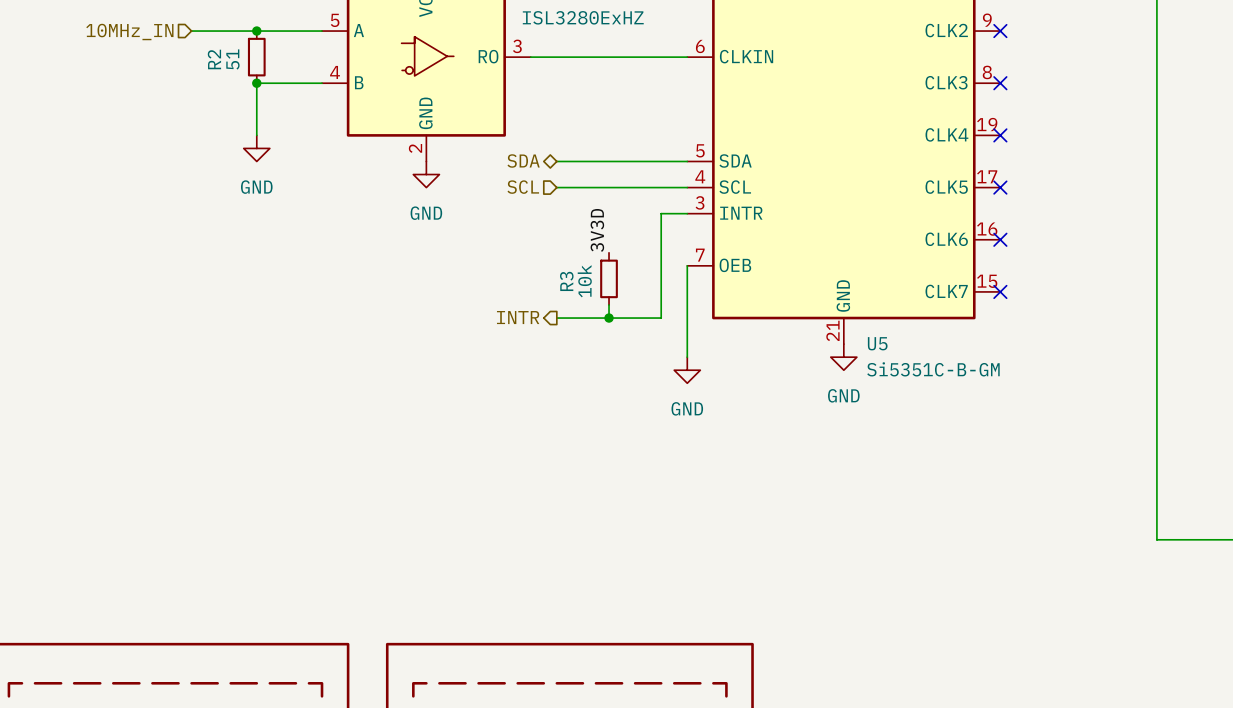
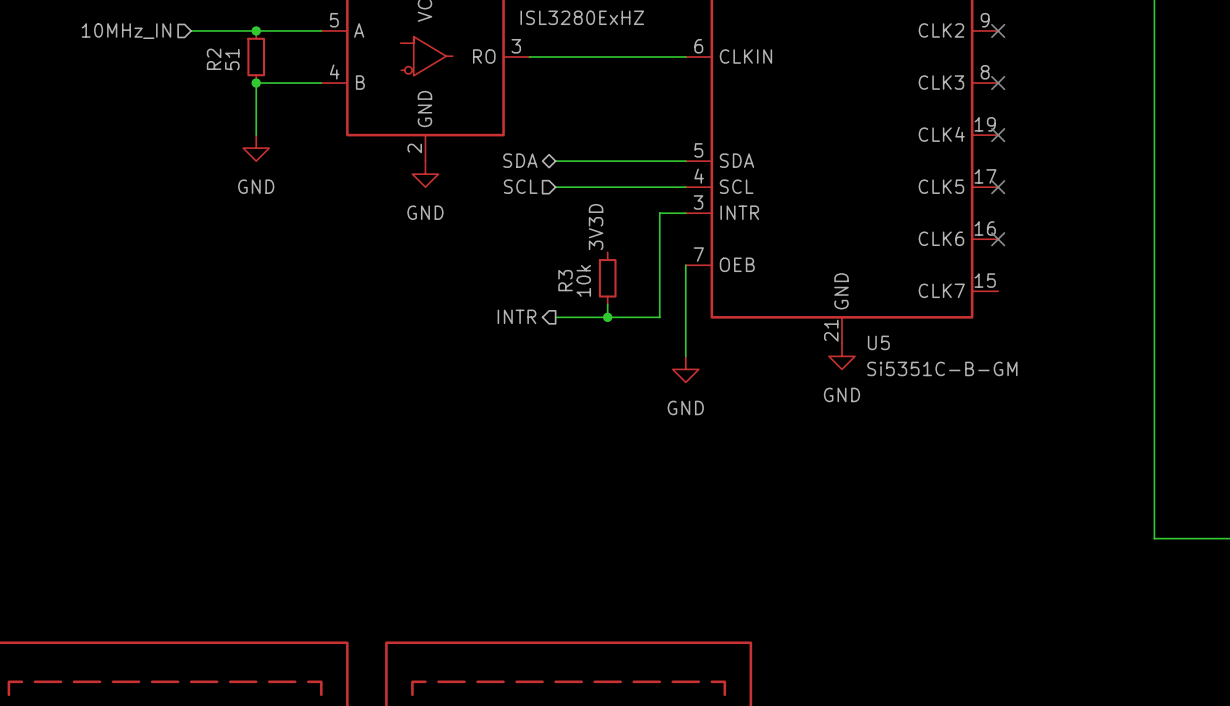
no-connect mark: (1000, 291) -> none

